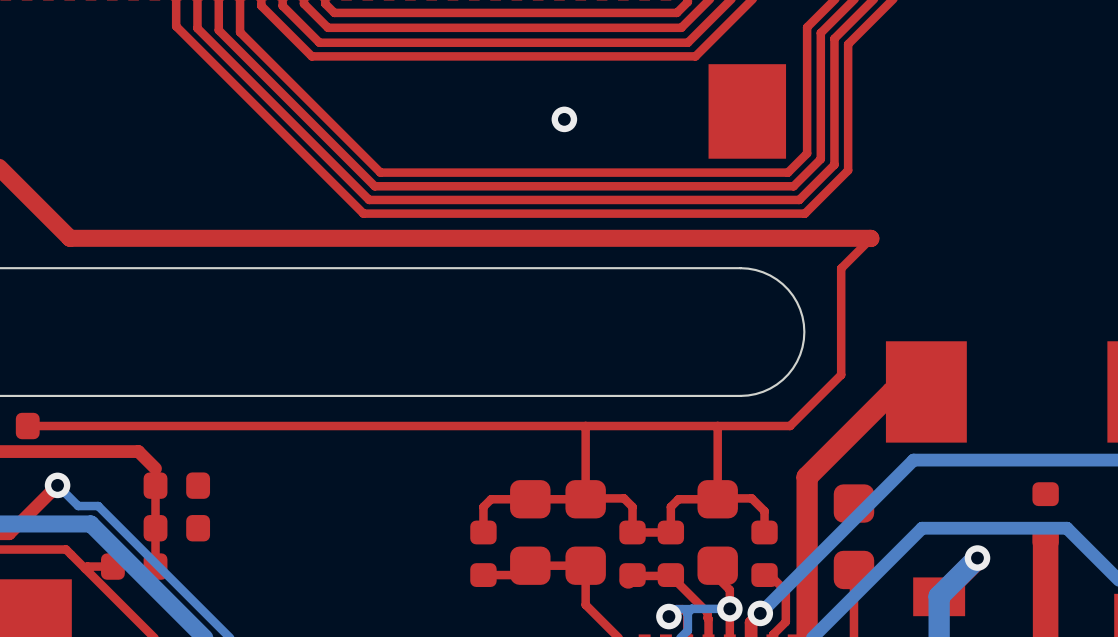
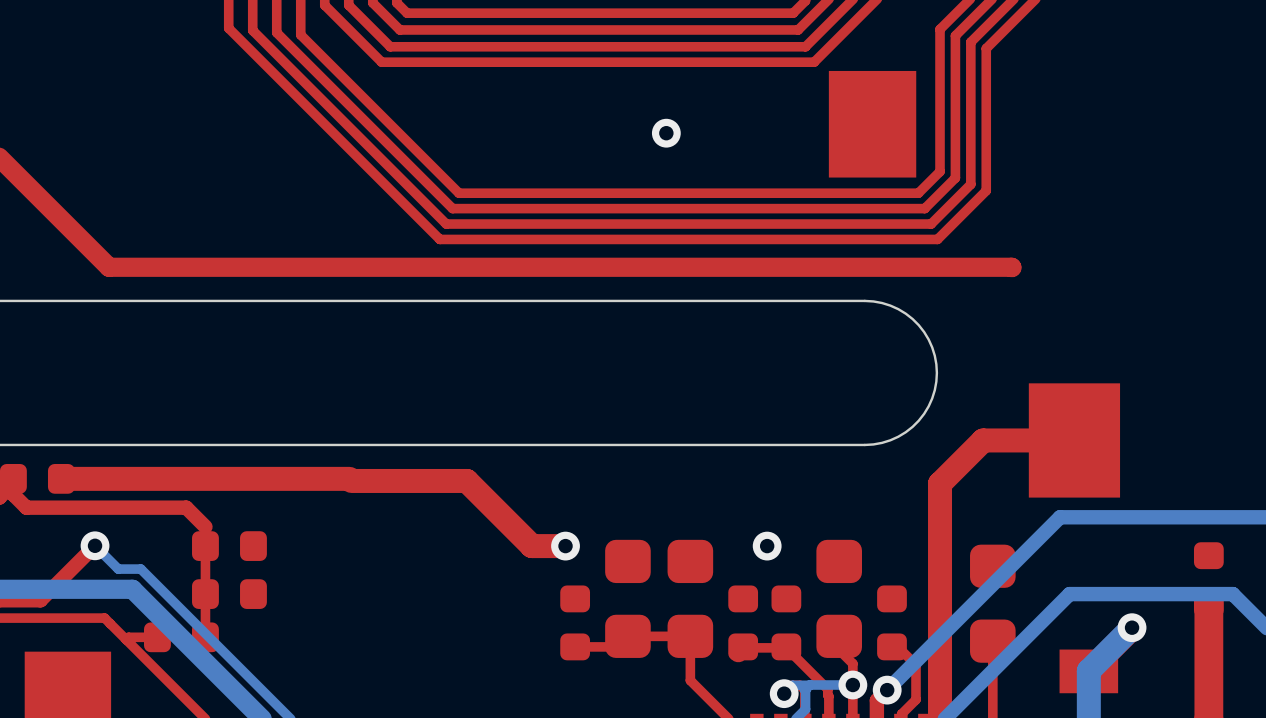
top track: (871, 238) (841, 268) (841, 374) (790, 426) (283, 426) -> (565, 546) (531, 546) (466, 480) (351, 480) (349, 478)
top track: (892, 391) (807, 477) -> (1036, 440) (983, 440) (940, 483) (940, 536)
top track width: thin (283, 426) (32, 426) -> thick (349, 478) (66, 478)
top track: (585, 426) (585, 499) -> none
top track: (717, 426) (717, 499) -> none
via: none -> (565, 546)
via: none -> (767, 546)
top track: (585, 499) (491, 499) (483, 506) (483, 532) -> none
top track: (717, 499) (678, 499) (670, 506) (670, 532) (632, 532) (632, 506) (623, 498) (585, 499) -> none
top track: (717, 499) (751, 498) (764, 511) (764, 532) -> none

